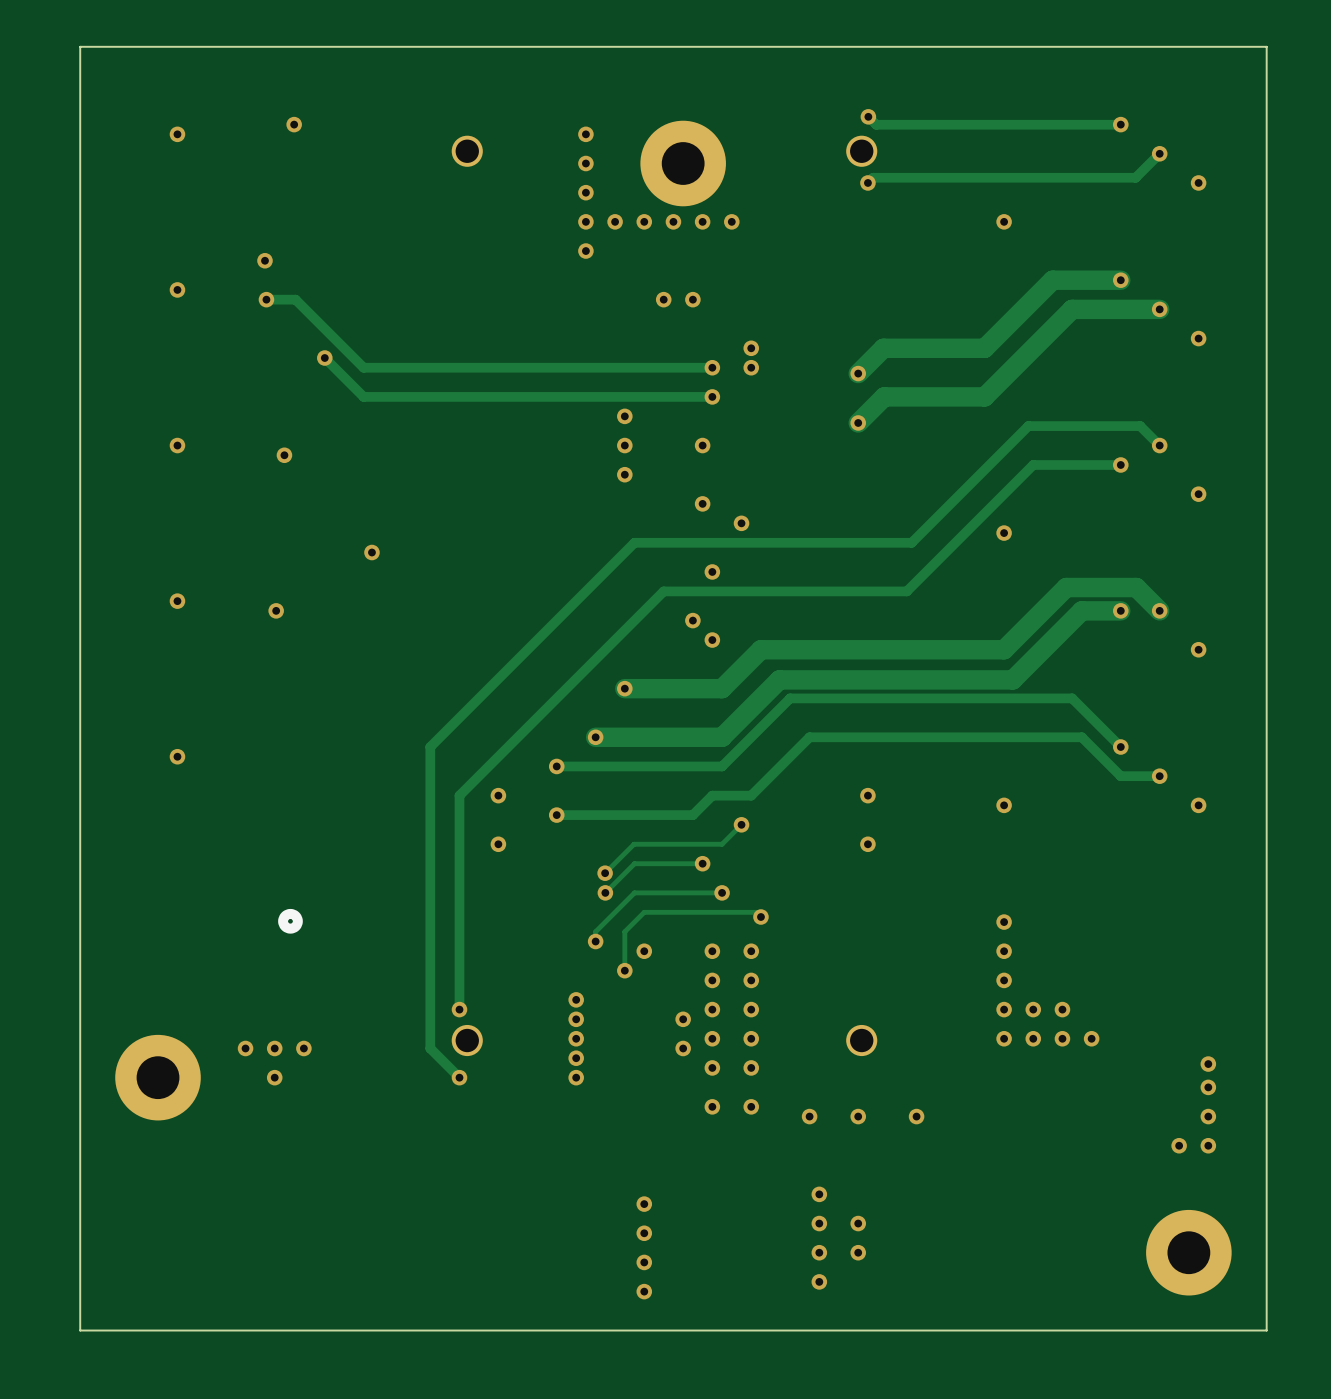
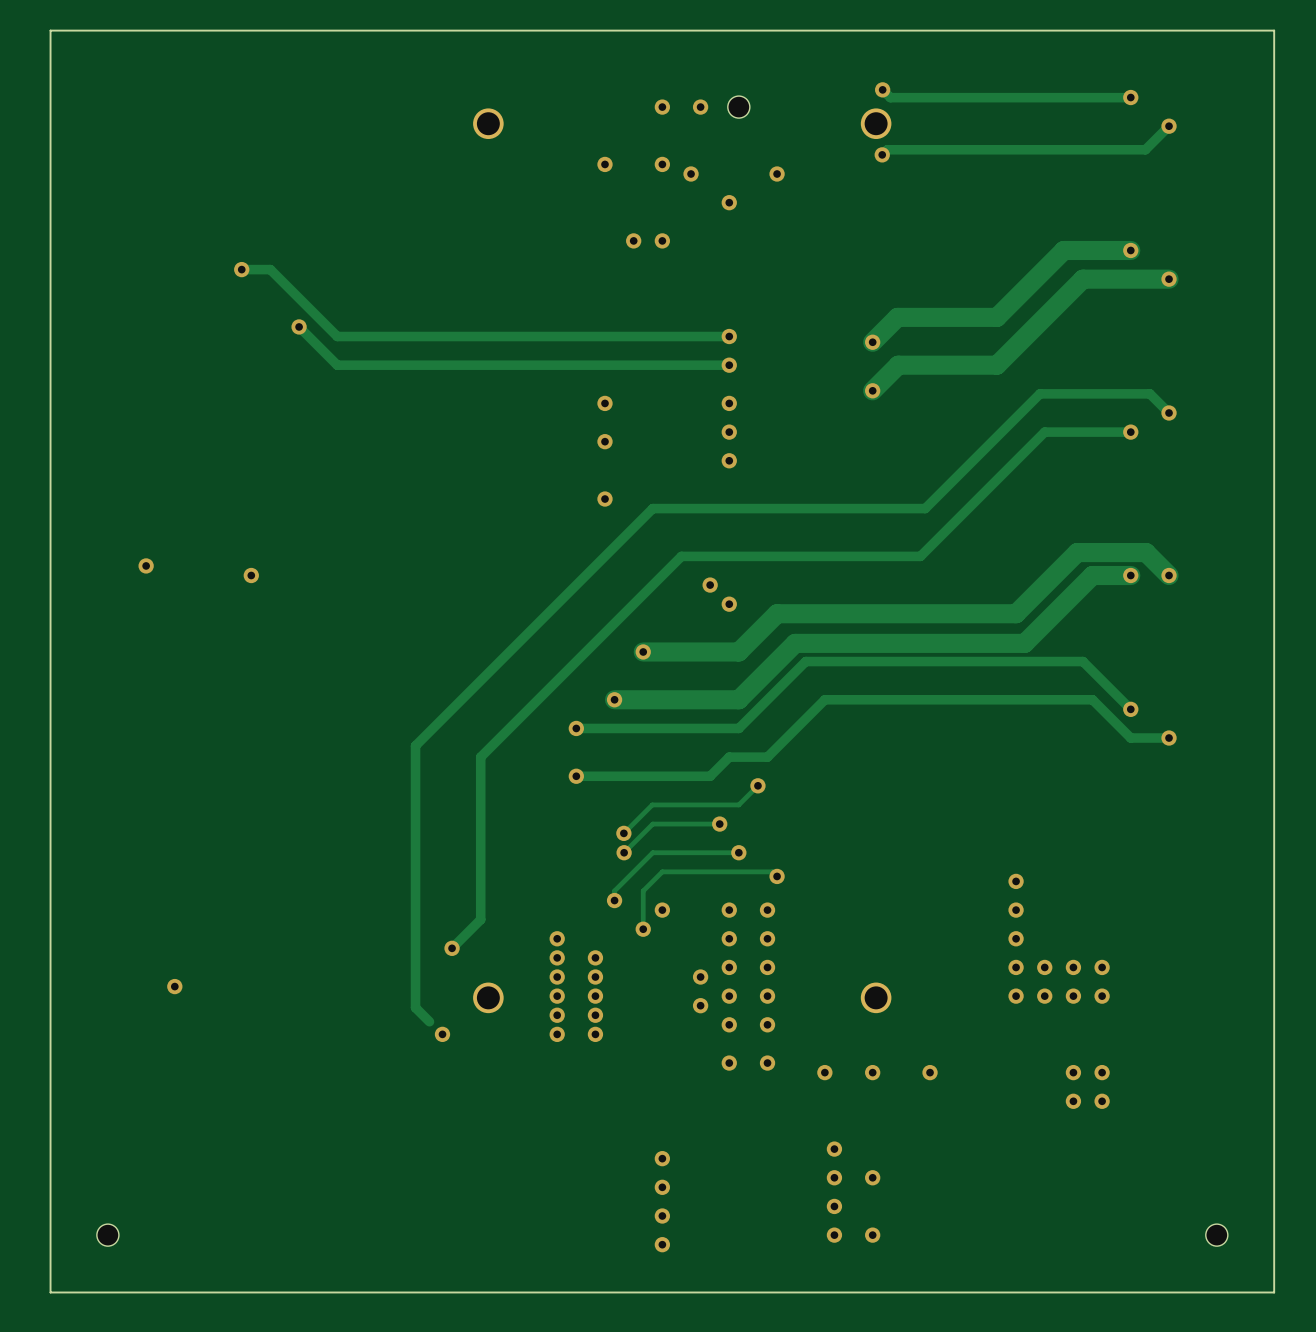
board edge: (1266, 56) (1266, 46) (80, 46) (80, 1330) (1266, 1330) -> (1274, 30) (50, 30) (50, 1292) (1274, 1292) (1274, 1282)
via: (294, 124) -> none
via: (177, 134) -> none
via: (585, 134) -> none
via: none -> (662, 107)
via: none -> (700, 107)
part: none -> (738, 107)
via: (585, 163) -> none
part: (683, 163) -> none
via: (1198, 182) -> none
via: none -> (662, 164)
via: none -> (691, 174)
via: none -> (777, 174)
via: (585, 221) -> none
via: (615, 221) -> none
via: (644, 221) -> none
via: (673, 221) -> none
via position: (702, 221) -> (729, 202)
via: (731, 221) -> none
via: (1004, 221) -> none
via: (585, 251) -> none
via: (264, 260) -> none
via: none -> (633, 240)
via: none -> (662, 240)
via: (177, 289) -> none
via: none -> (241, 269)
track: (266, 299) (295, 299) (363, 367) -> (241, 269) (270, 269) (337, 336) (386, 336)
via: (266, 299) -> none
via: (663, 299) -> none
via: (692, 299) -> none
via: (1198, 338) -> none
via: (751, 348) -> none
via: none -> (299, 326)
track: (324, 358) (363, 396) -> (299, 326) (337, 365) (386, 365)
via: (324, 358) -> none
via: (751, 367) -> none
via: (624, 416) -> none
via: none -> (605, 403)
via: (177, 445) -> none
via: (624, 445) -> none
via position: (702, 445) -> (729, 403)
via: (284, 455) -> none
via: none -> (729, 432)
via: none -> (605, 441)
via: (624, 474) -> none
via: (1198, 494) -> none
via position: (702, 503) -> (729, 460)
via: (741, 523) -> none
via: none -> (605, 499)
via: (1004, 533) -> none
via: (371, 552) -> none
via: (712, 571) -> none
via: none -> (146, 565)
via: (177, 601) -> none
via: none -> (251, 575)
via: (276, 610) -> none
via: (1198, 649) -> none
track: (430, 747) (430, 1048) (459, 1077) -> (452, 709) (415, 745) (415, 1007) (429, 1021)
via: (177, 756) -> none
via: (498, 795) -> none
via: (867, 795) -> none
via: (1004, 805) -> none
via: (1198, 805) -> none
via: (498, 844) -> none
via: (867, 844) -> none
part: (290, 921) -> none
track: (459, 960) (459, 1009) -> (480, 919) (452, 948)
via: none -> (557, 938)
via: none -> (557, 957)
via position: (459, 1009) -> (452, 948)
via: none -> (1102, 967)
via: none -> (557, 977)
via: none -> (174, 986)
via: none -> (557, 996)
via: (245, 1048) -> none
via: (274, 1048) -> none
via: (303, 1048) -> none
via: none -> (557, 1015)
via: (1208, 1064) -> none
part: (158, 1077) -> none
via: (274, 1077) -> none
via: none -> (442, 1034)
via: (459, 1077) -> none
via: none -> (557, 1034)
via: (1208, 1087) -> none
via: none -> (1073, 1072)
via: none -> (1102, 1072)
via: (1208, 1116) -> none
via: none -> (1073, 1101)
via: none -> (1102, 1101)
via: (1179, 1145) -> none
via: (1208, 1145) -> none
via position: (858, 1252) -> (872, 1235)
part: (1188, 1252) -> none
part: none -> (107, 1235)
part: none -> (1216, 1235)

